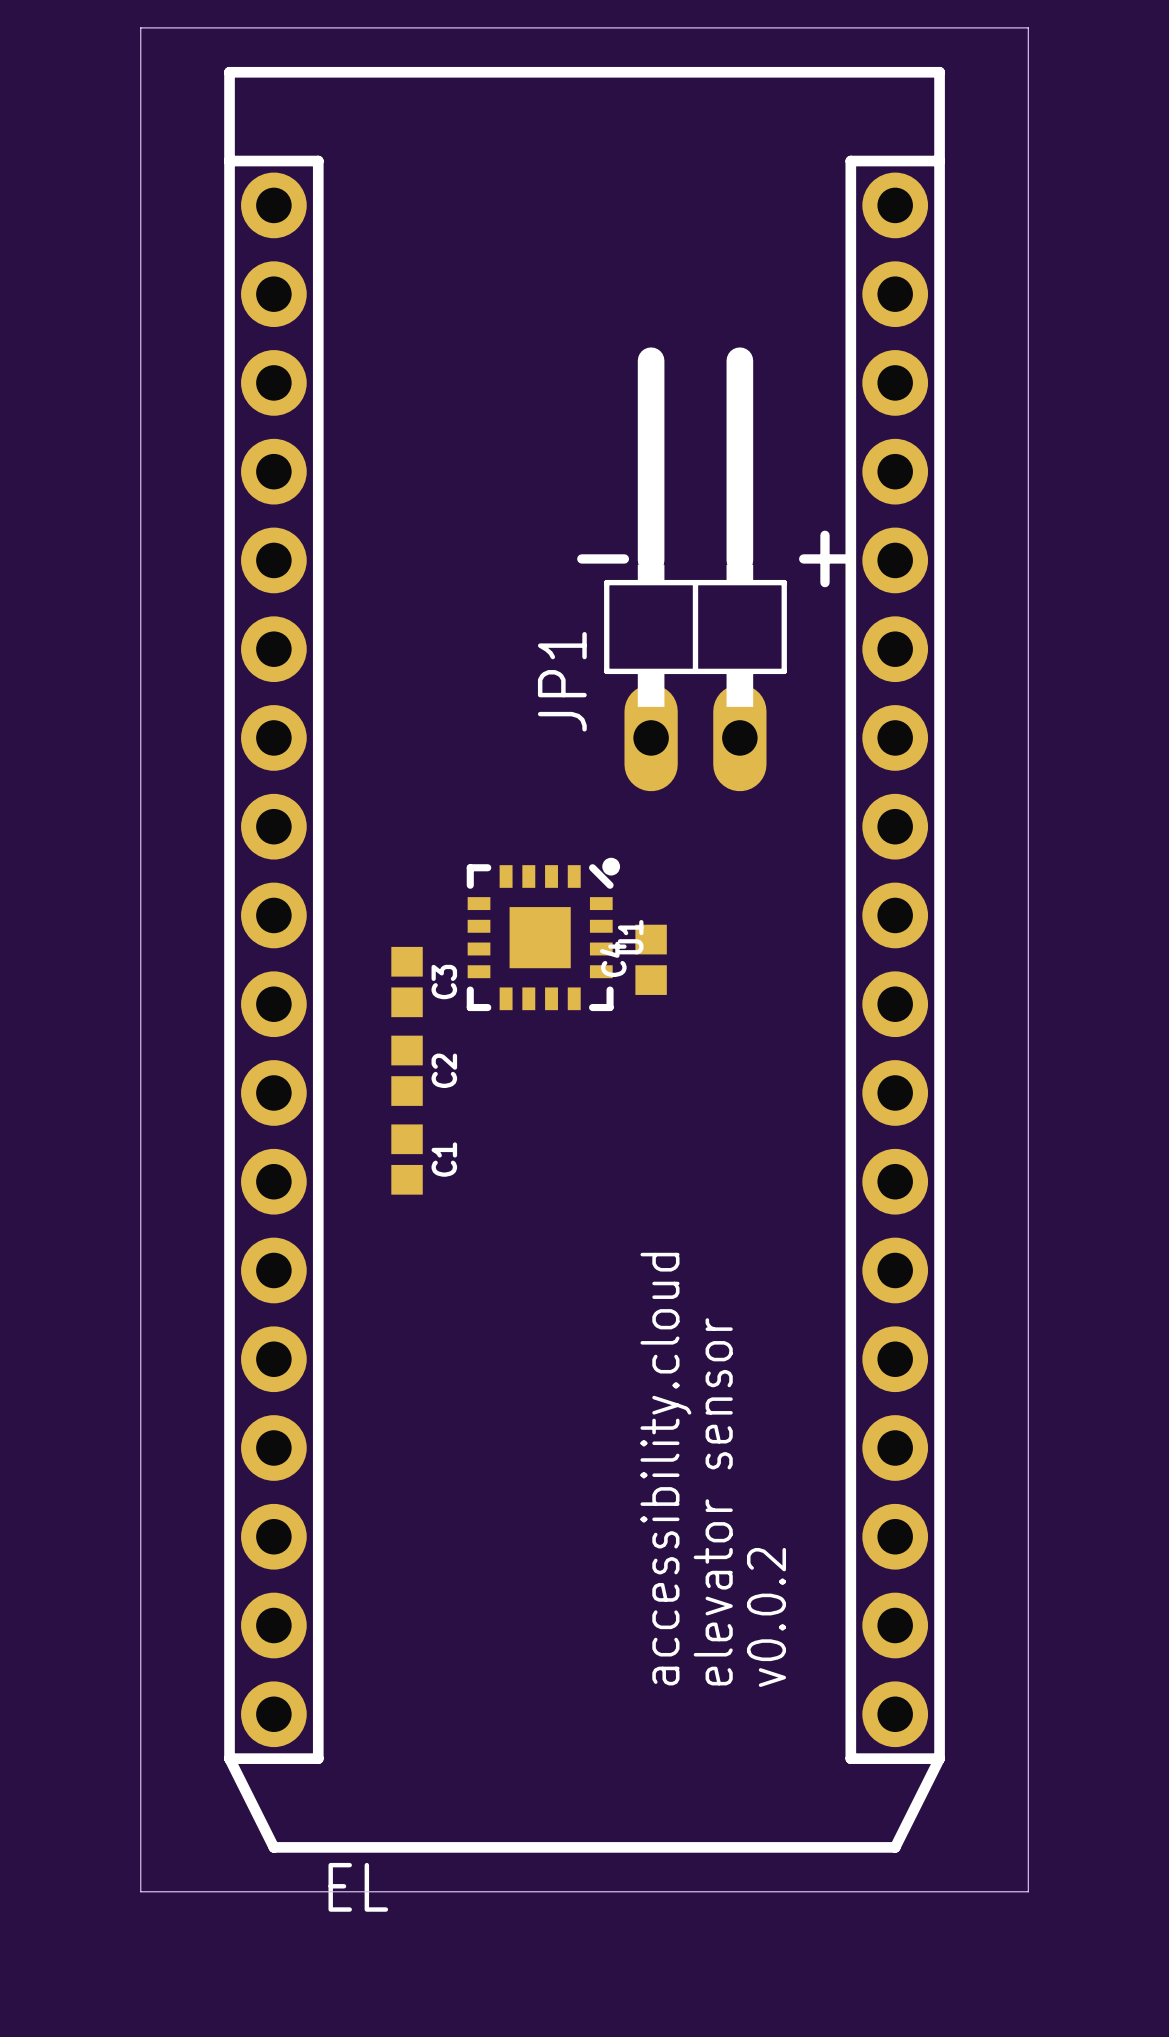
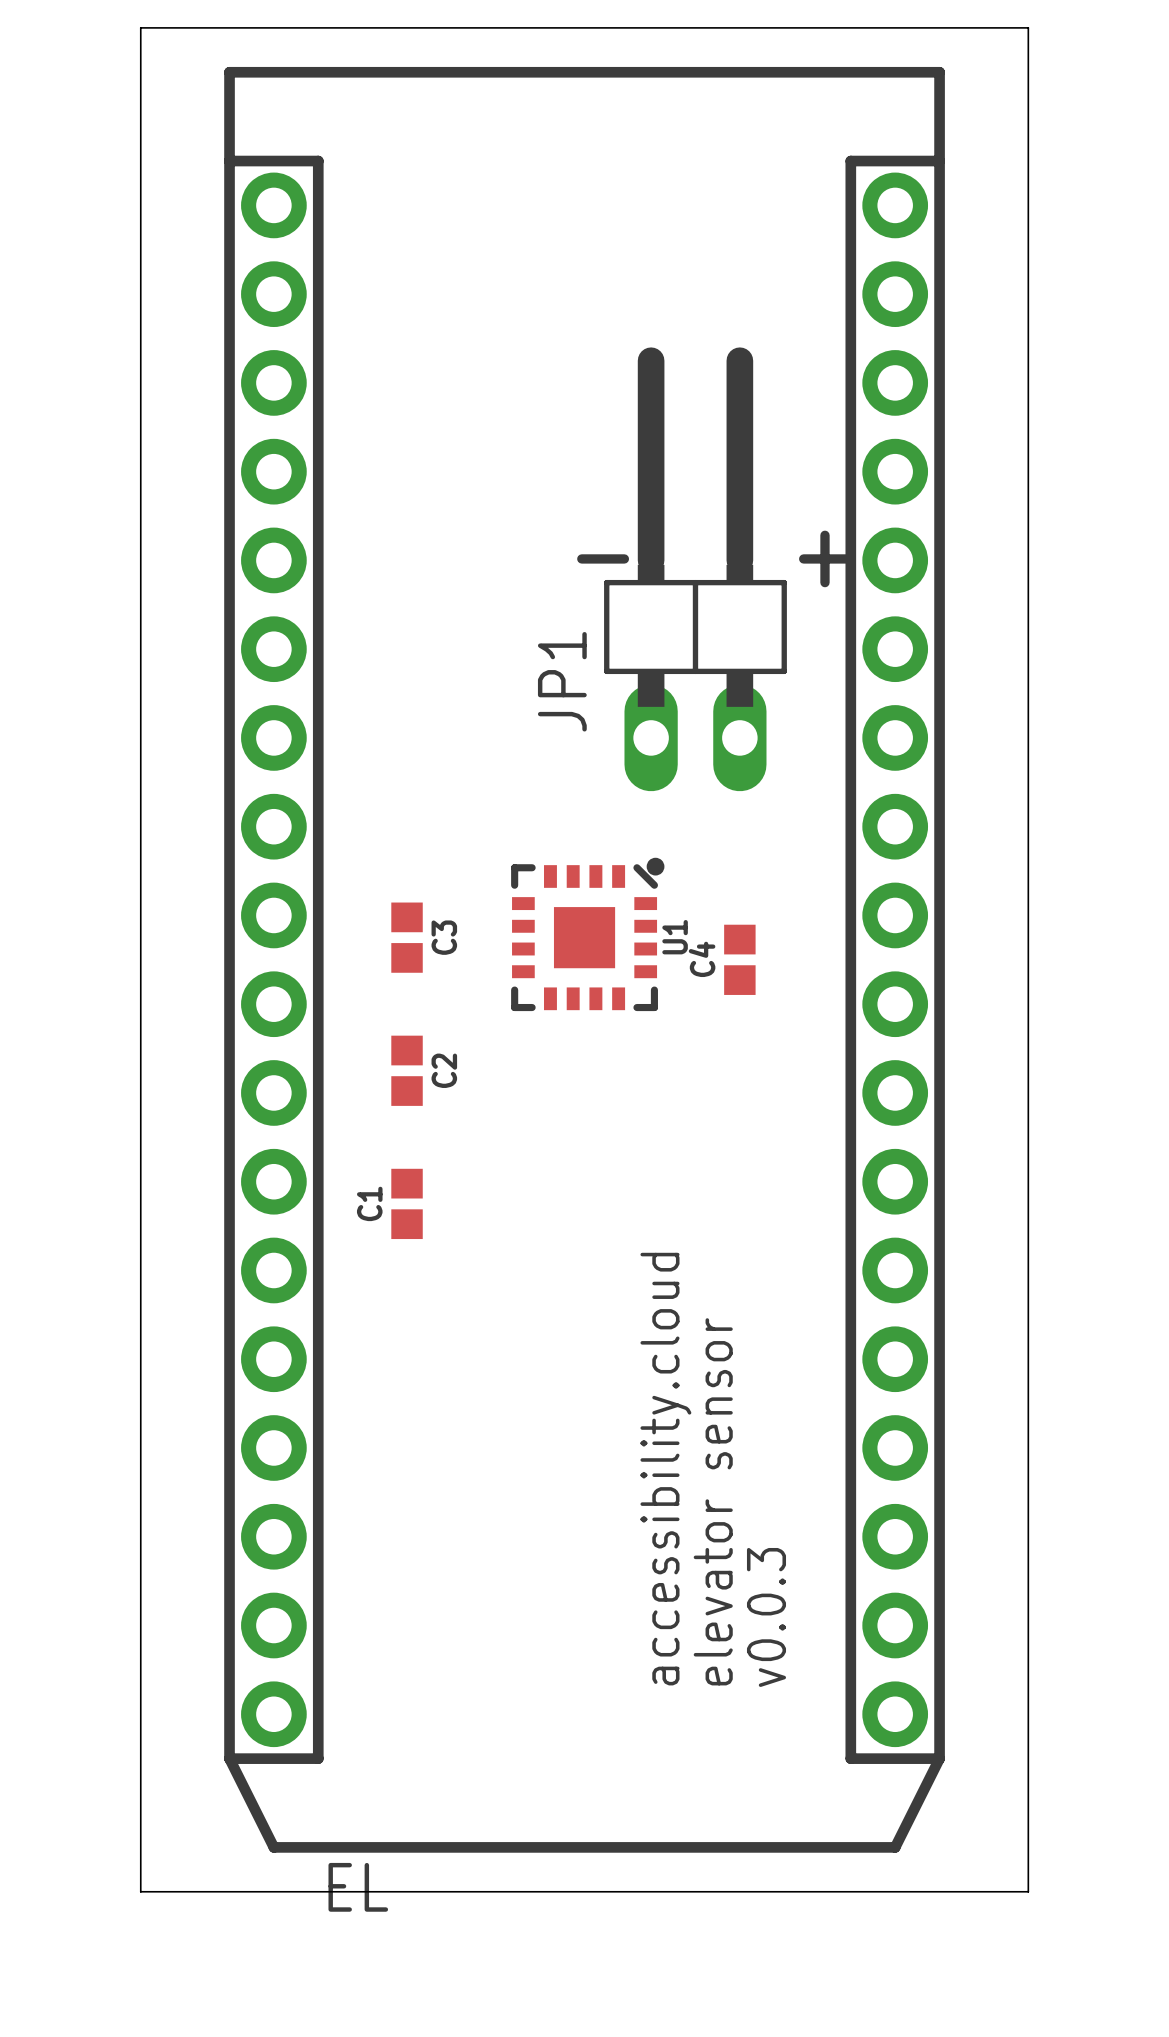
U1 position: (543, 934) -> (587, 934)
C4 position: (651, 959) -> (739, 959)
C3 position: (407, 982) -> (407, 937)
C1 position: (407, 1159) -> (407, 1203)
C1 name position: C1 (444, 1159) -> C1 (369, 1203)
text: v0.0.2 (766, 1617) -> v0.0.3 (766, 1617)

